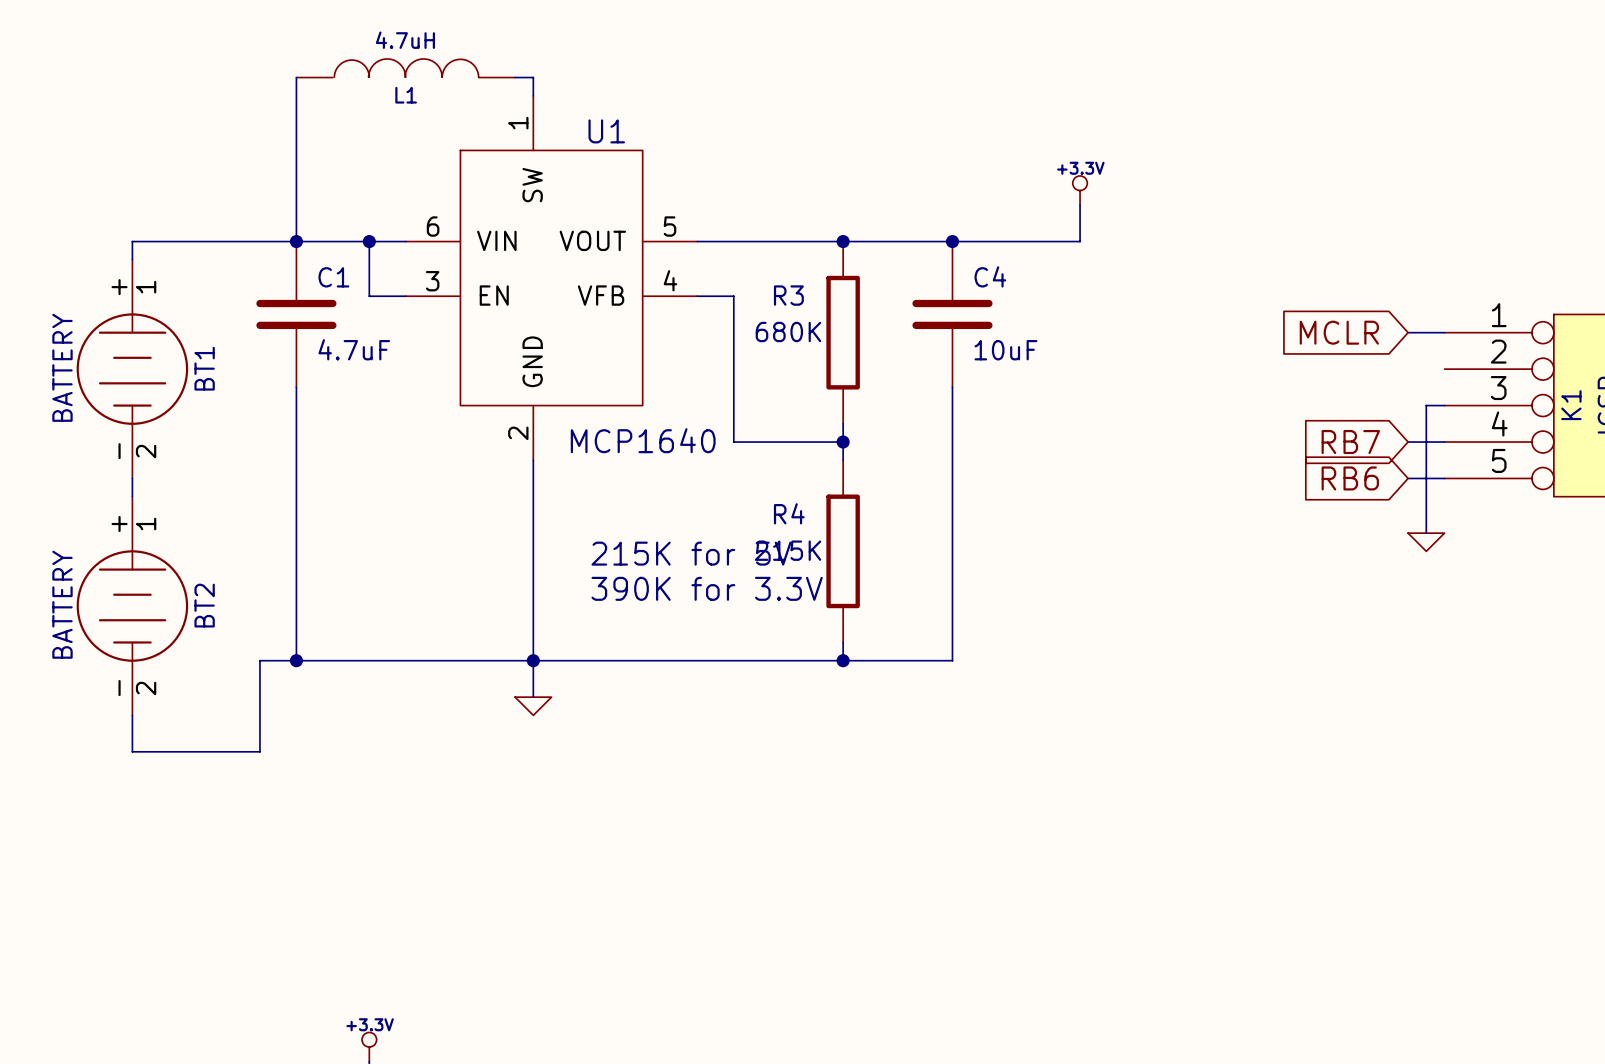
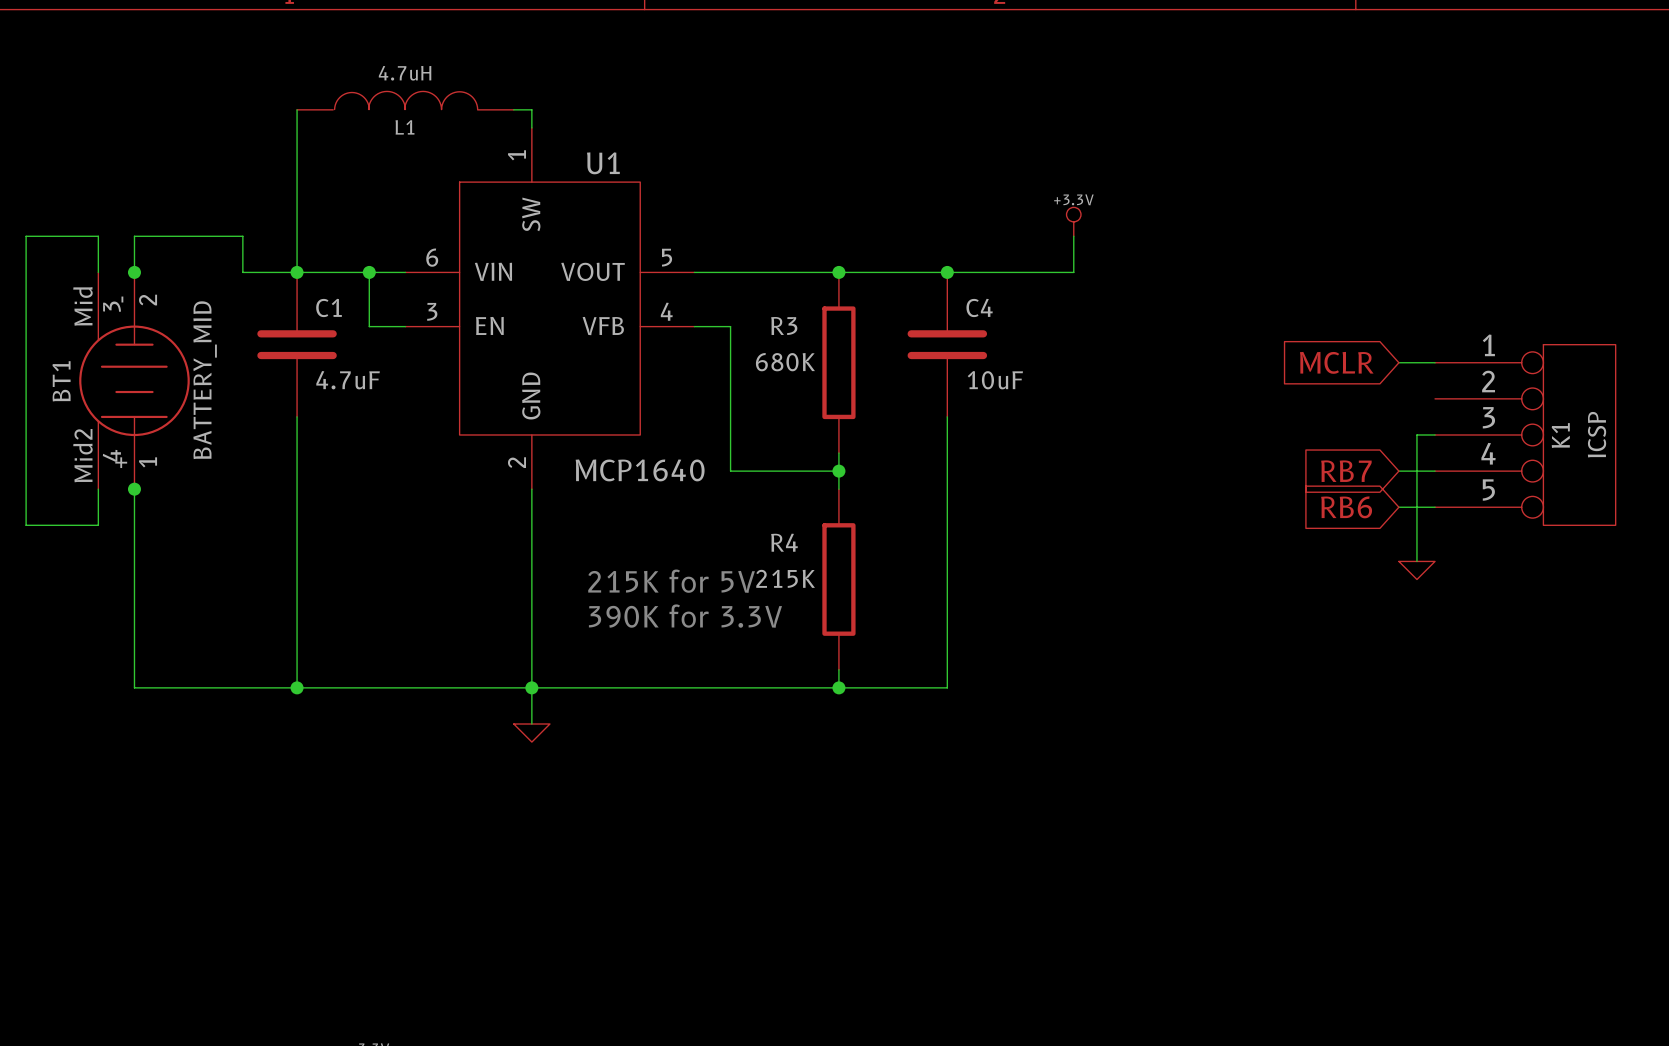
wire: none -> (98, 272) (98, 236) (26, 236) (26, 525) (98, 525) (98, 489)
junction: none -> (134, 272)
wire: (241, 241) (132, 241) (132, 259) -> (242, 272) (242, 236) (134, 236) (134, 272)
BT1 symbol: [76, 259, 189, 479] -> [79, 272, 190, 490]
BT1 value: BATTERY (62, 367) -> BATTERY_MID (205, 380)
BT1 name position: BT1 (204, 368) -> BT1 (61, 381)
junction: none -> (134, 489)
BT2: BATTERY (132, 606) -> none
wire: (259, 660) (259, 751) (132, 751) (132, 715) -> (260, 687) (134, 687) (134, 525)

